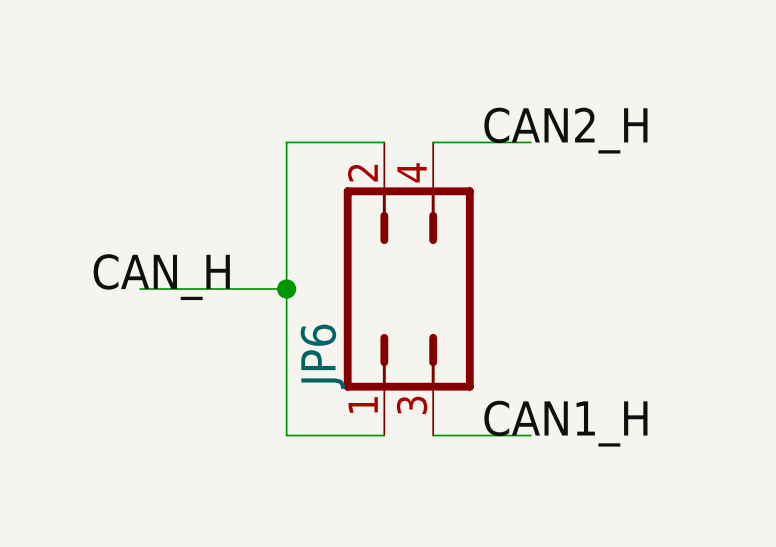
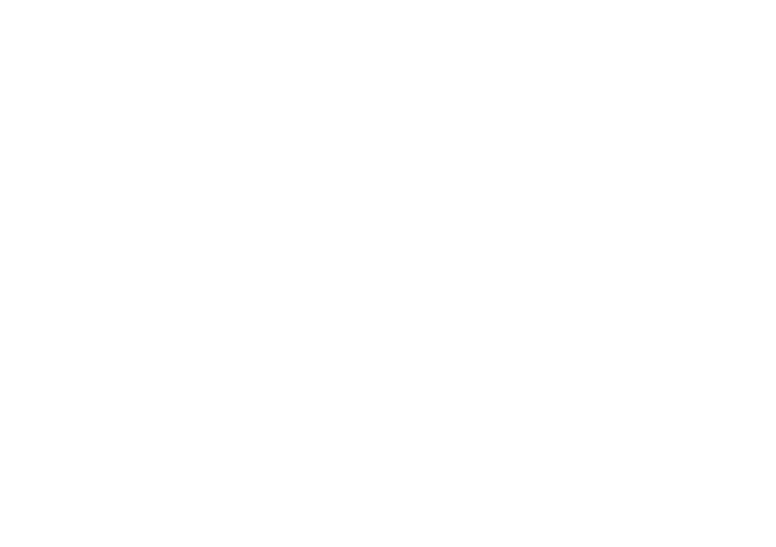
label: CAN2_H (565, 130) -> none
wire: (384, 142) (286, 142) (286, 435) (384, 435) -> none
wire: (433, 142) (530, 142) -> none
label: CAN_H (161, 277) -> none
wire: (140, 289) (286, 289) -> none
junction: (286, 289) -> none
JP6: (408, 289) -> none
label: CAN1_H (565, 423) -> none
wire: (433, 435) (530, 435) -> none

